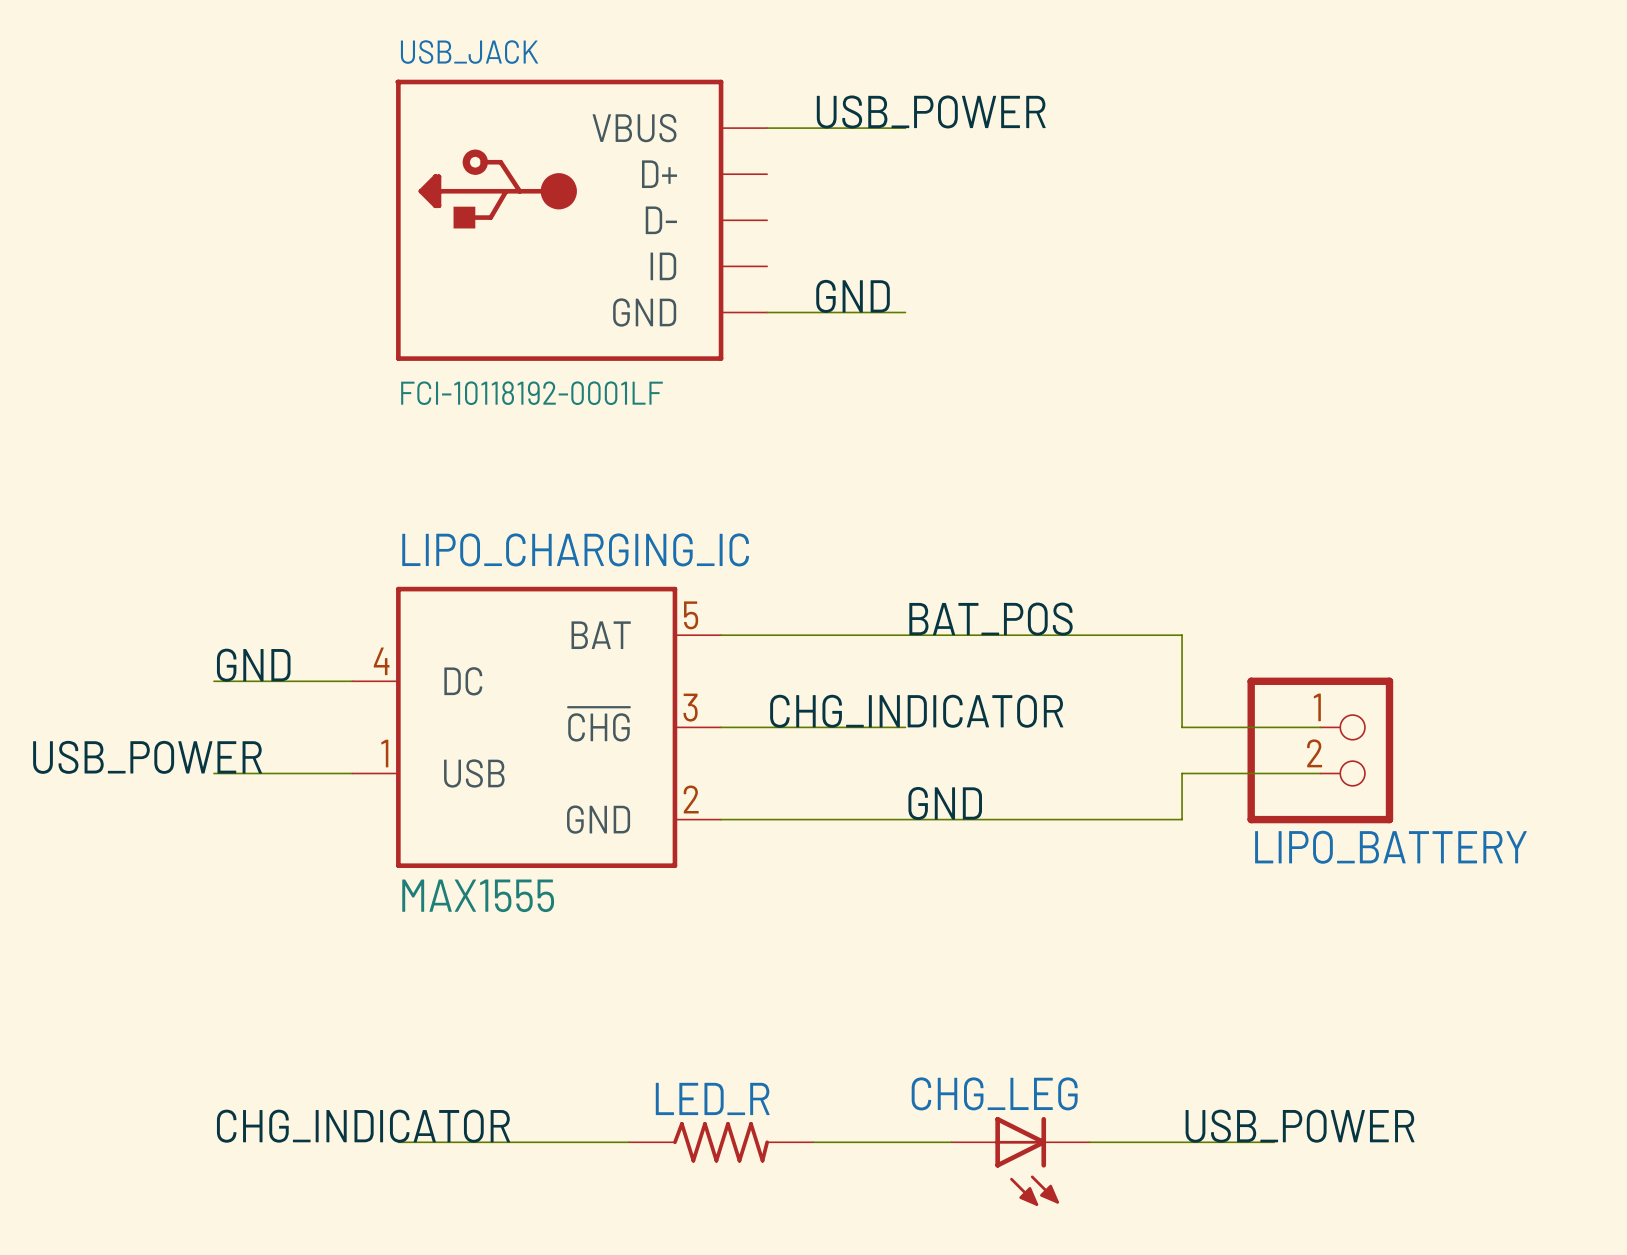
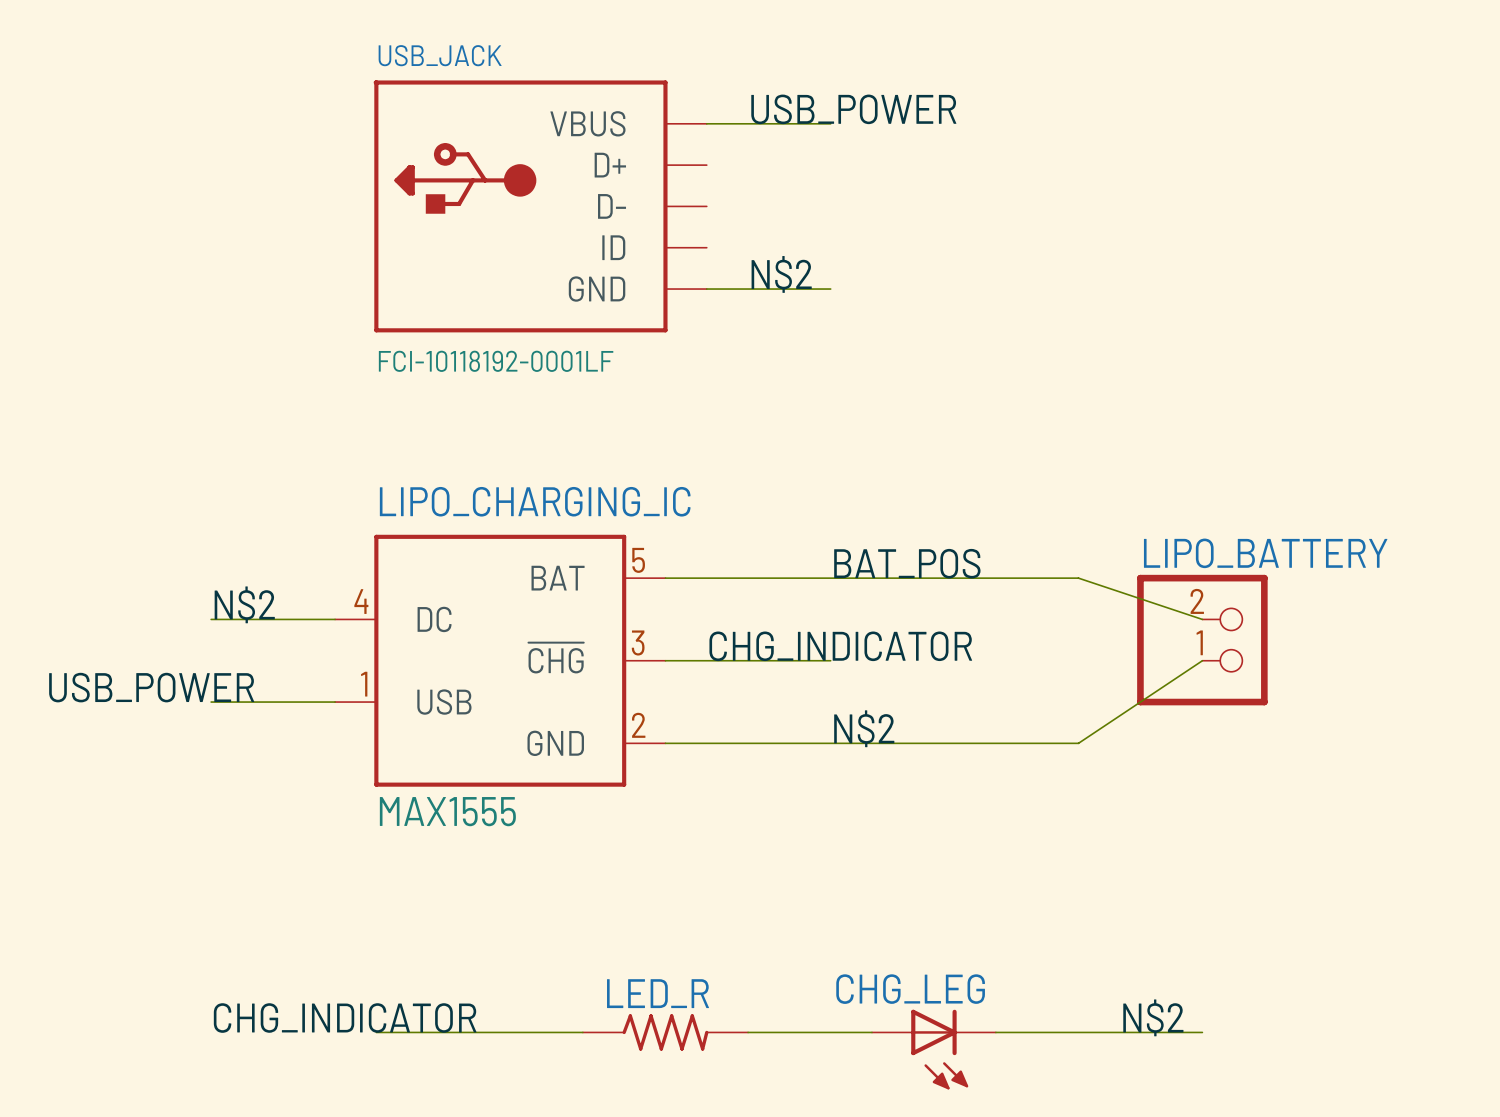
label: GND (853, 296) -> N$2 (781, 274)
wire: (1182, 635) (1182, 727) (1320, 727) -> (1078, 578) (1202, 619)
label: GND (253, 665) -> N$2 (244, 604)
LIPO_BATTERY: none -> (1202, 640)
LIPO_BATTERY: (1320, 750) -> none
wire: (1320, 773) (1182, 773) (1182, 819) -> (1202, 660) (1078, 743)
label: GND (945, 803) -> N$2 (864, 728)
label: none -> N$2 (1153, 1017)
label: USB_POWER (1300, 1126) -> none
wire: none -> (1161, 1032) (1202, 1032)

